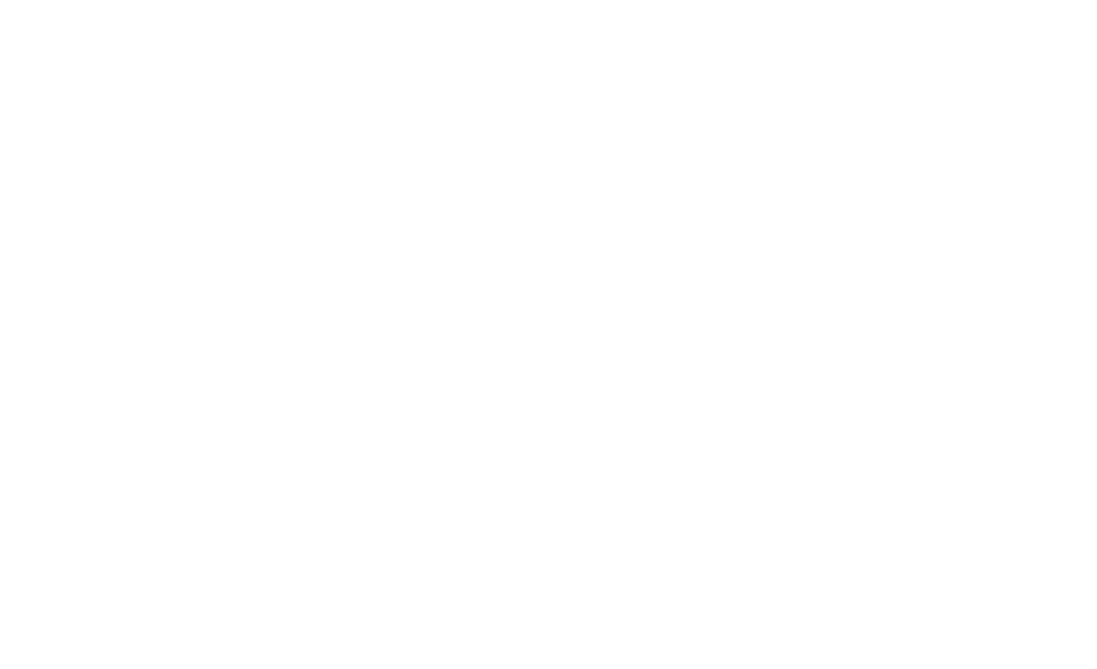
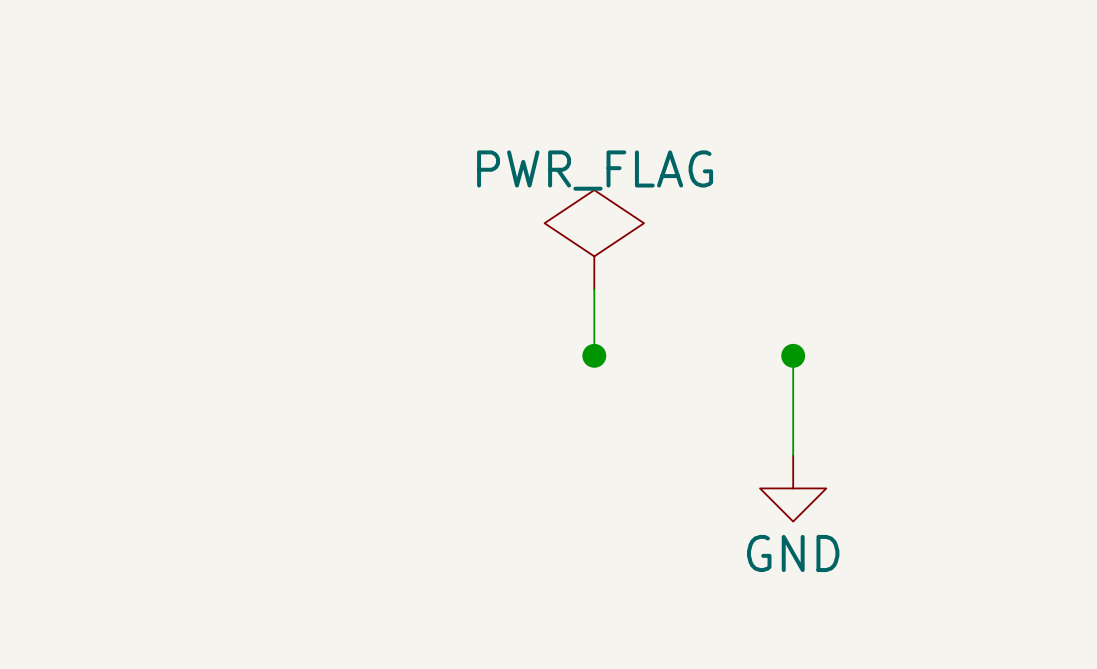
power symbol: none -> PWR_FLAG (594, 239)
wire: none -> (594, 289) (594, 355)
junction: none -> (594, 355)
wire: none -> (793, 355) (793, 455)
junction: none -> (793, 355)
power symbol: none -> GND (793, 488)

